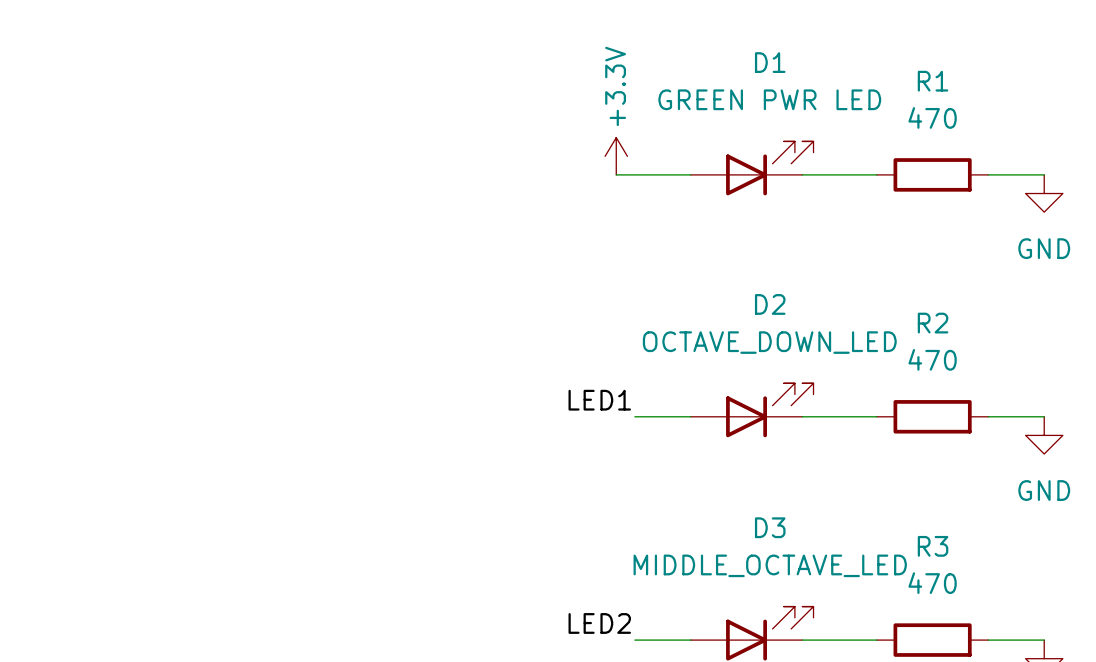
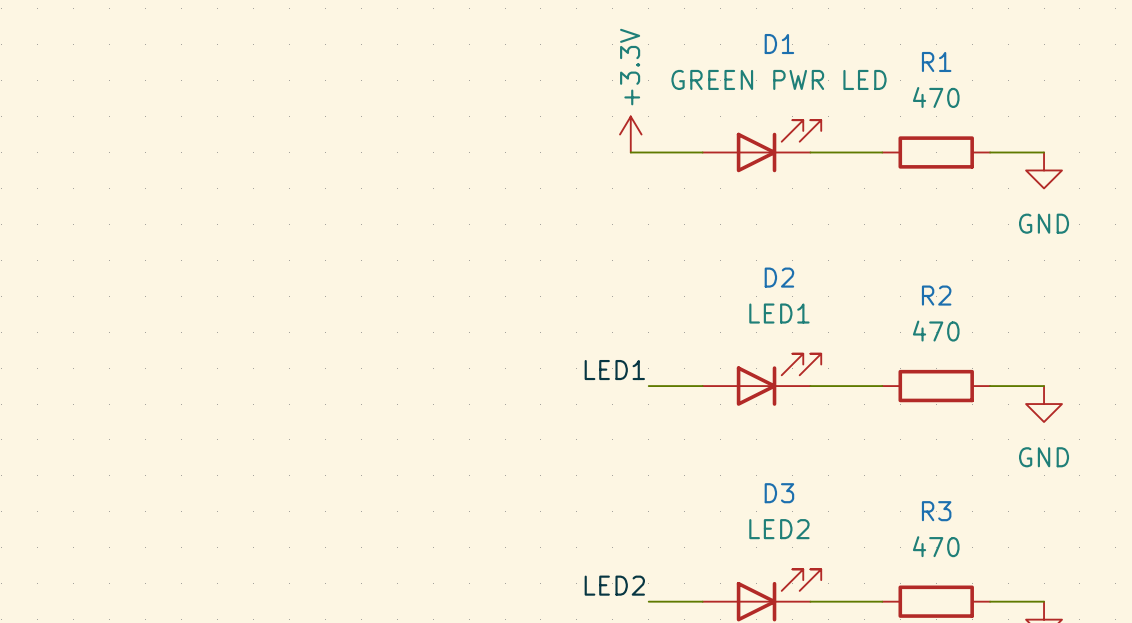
D2 value: OCTAVE_DOWN_LED (769, 342) -> LED1 (779, 313)
D3 value: MIDDLE_OCTAVE_LED (770, 565) -> LED2 (779, 529)

